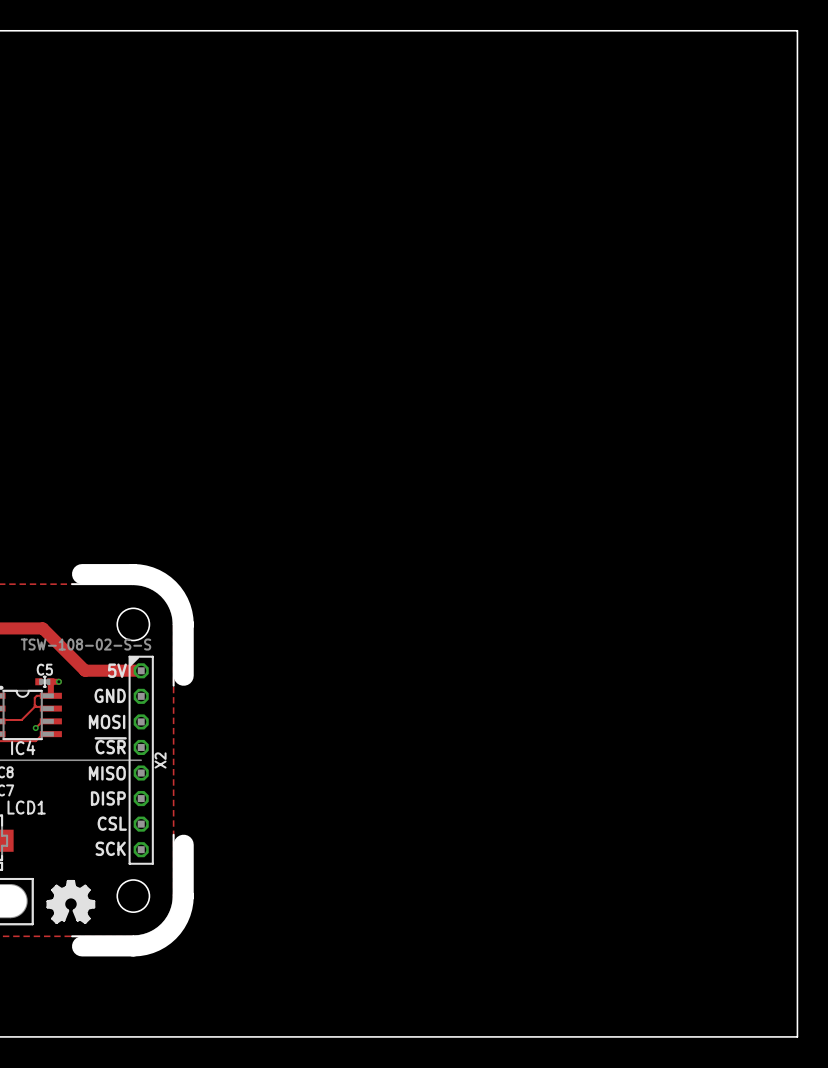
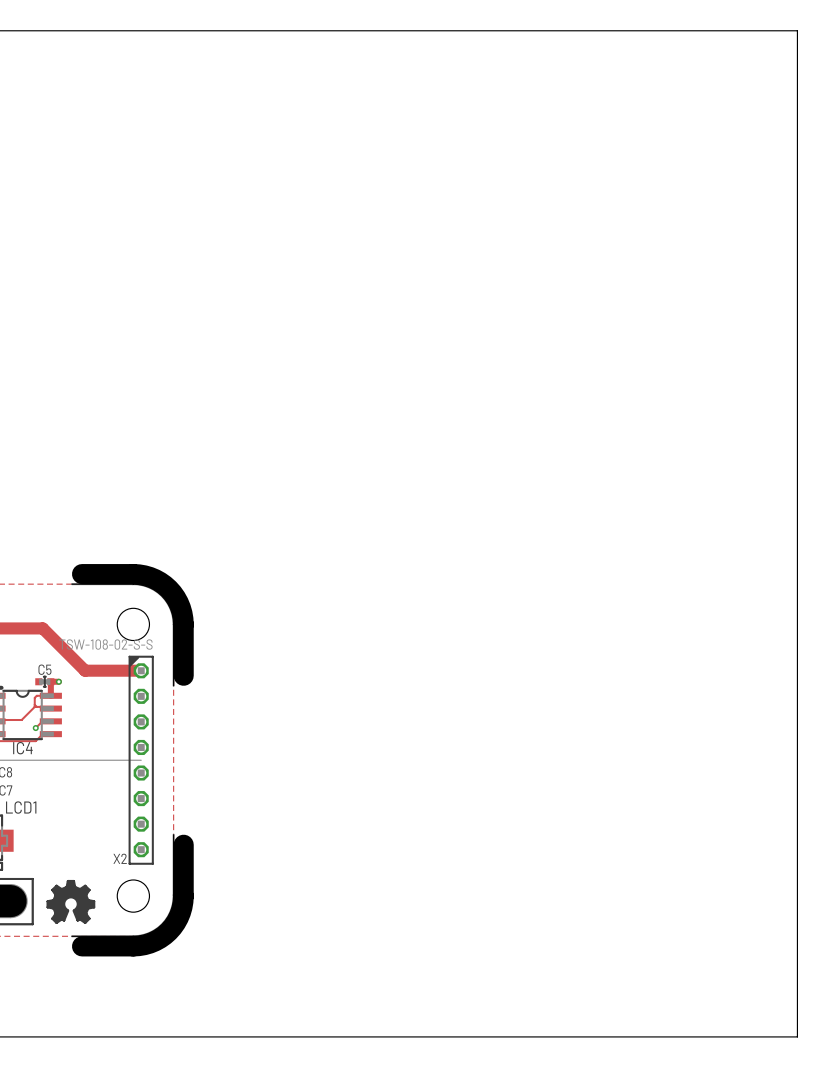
text: 5V (117, 670) -> none
text: GND (110, 695) -> none
text: MOSI (107, 722) -> none
text: ~{CSR} (110, 745) -> none
X2 name rotation: 0° (160, 760) -> 90° clockwise (120, 858)
X2 name position: X2 (160, 760) -> X2 (120, 858)
text: MISO (107, 773) -> none
text: DISP (108, 798) -> none
text: CSL (112, 823) -> none
text: SCK (110, 848) -> none

